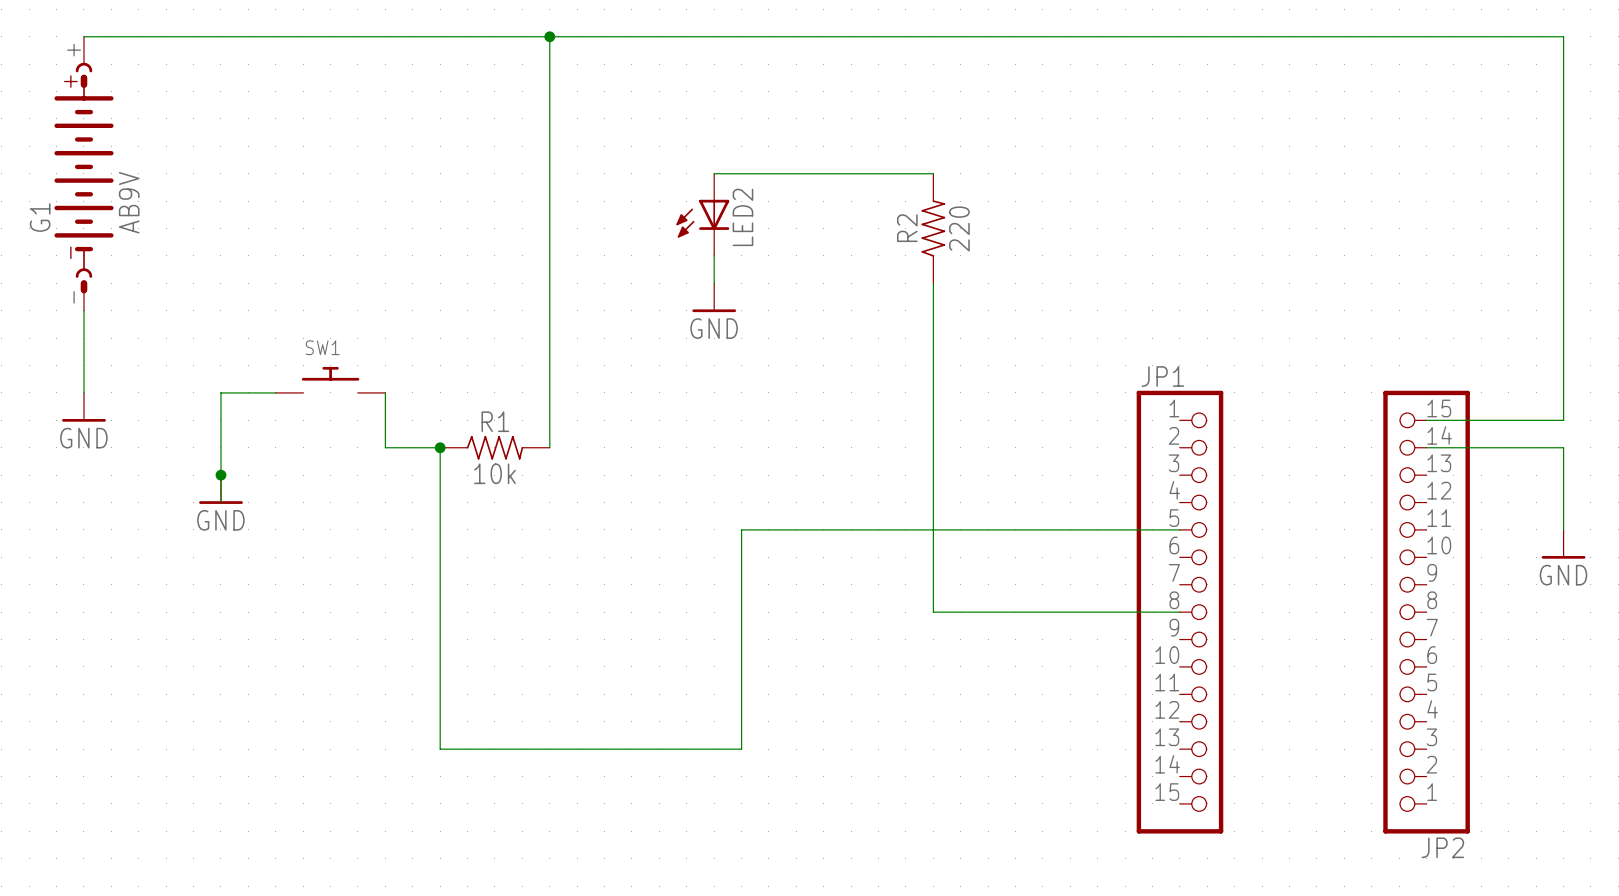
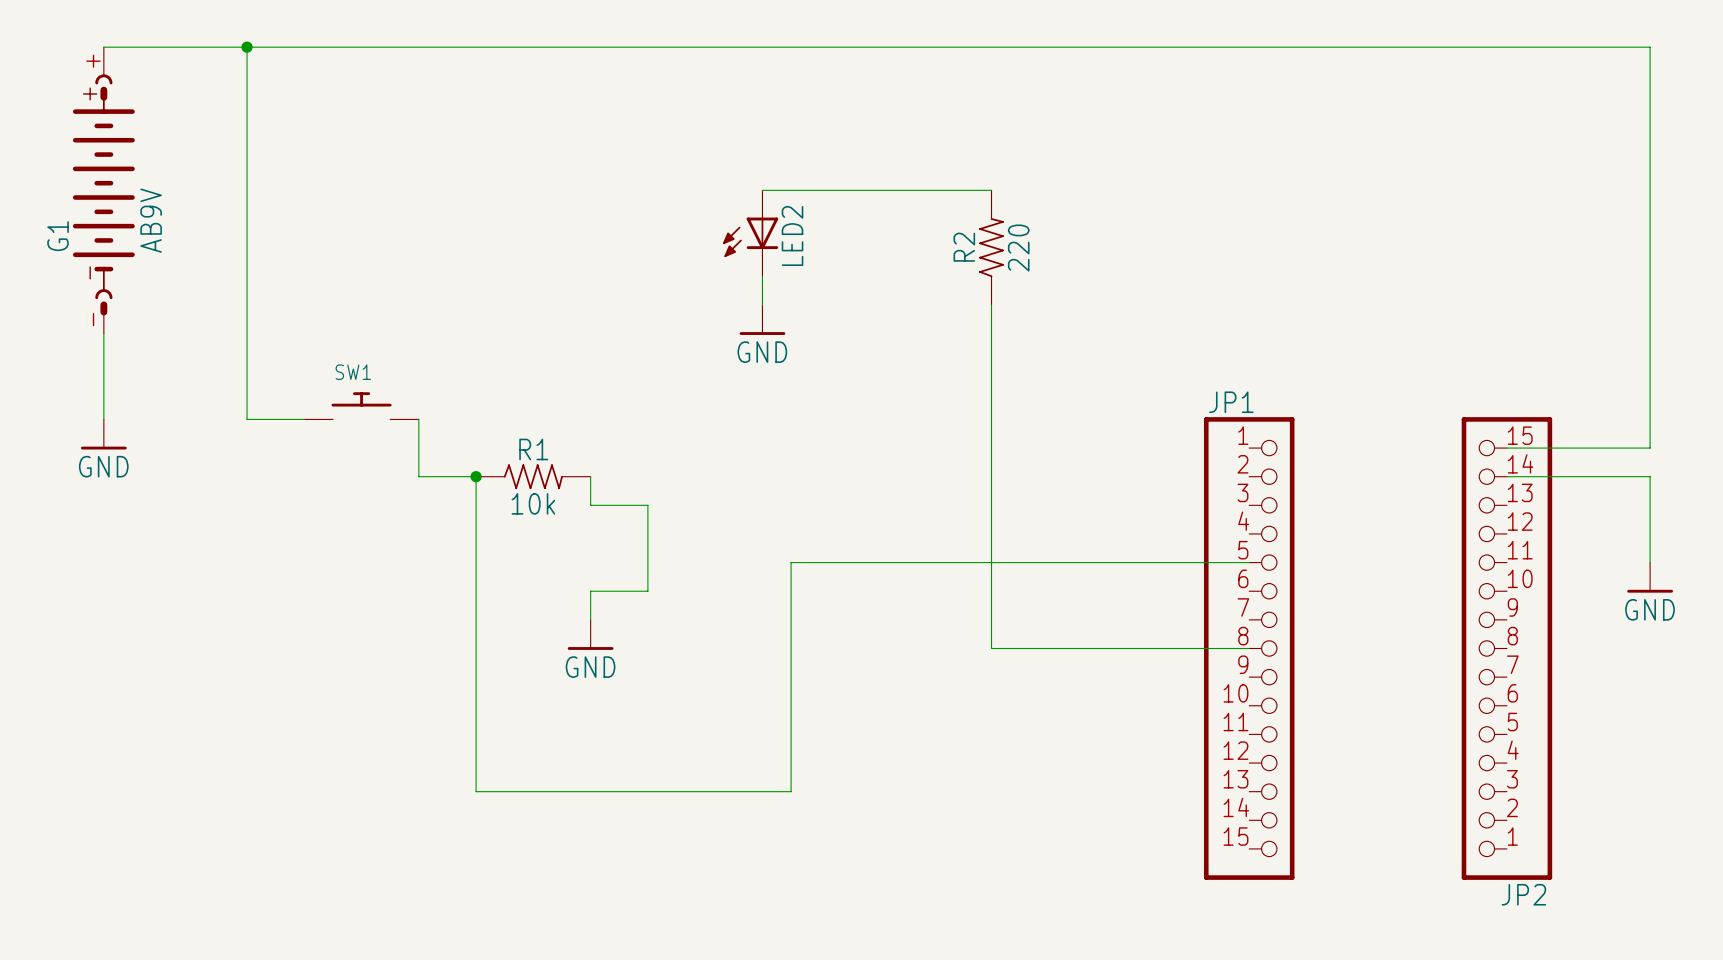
junction: none -> (247, 47)
wire: (549, 36) (549, 447) -> (590, 619) (590, 591) (647, 591) (647, 505) (590, 505) (590, 476)
junction: (549, 36) -> none
wire: (220, 392) (220, 502) -> (247, 419) (247, 47)
junction: (220, 475) -> none
power symbol: GND (220, 489) -> none
power symbol: none -> GND (590, 634)

